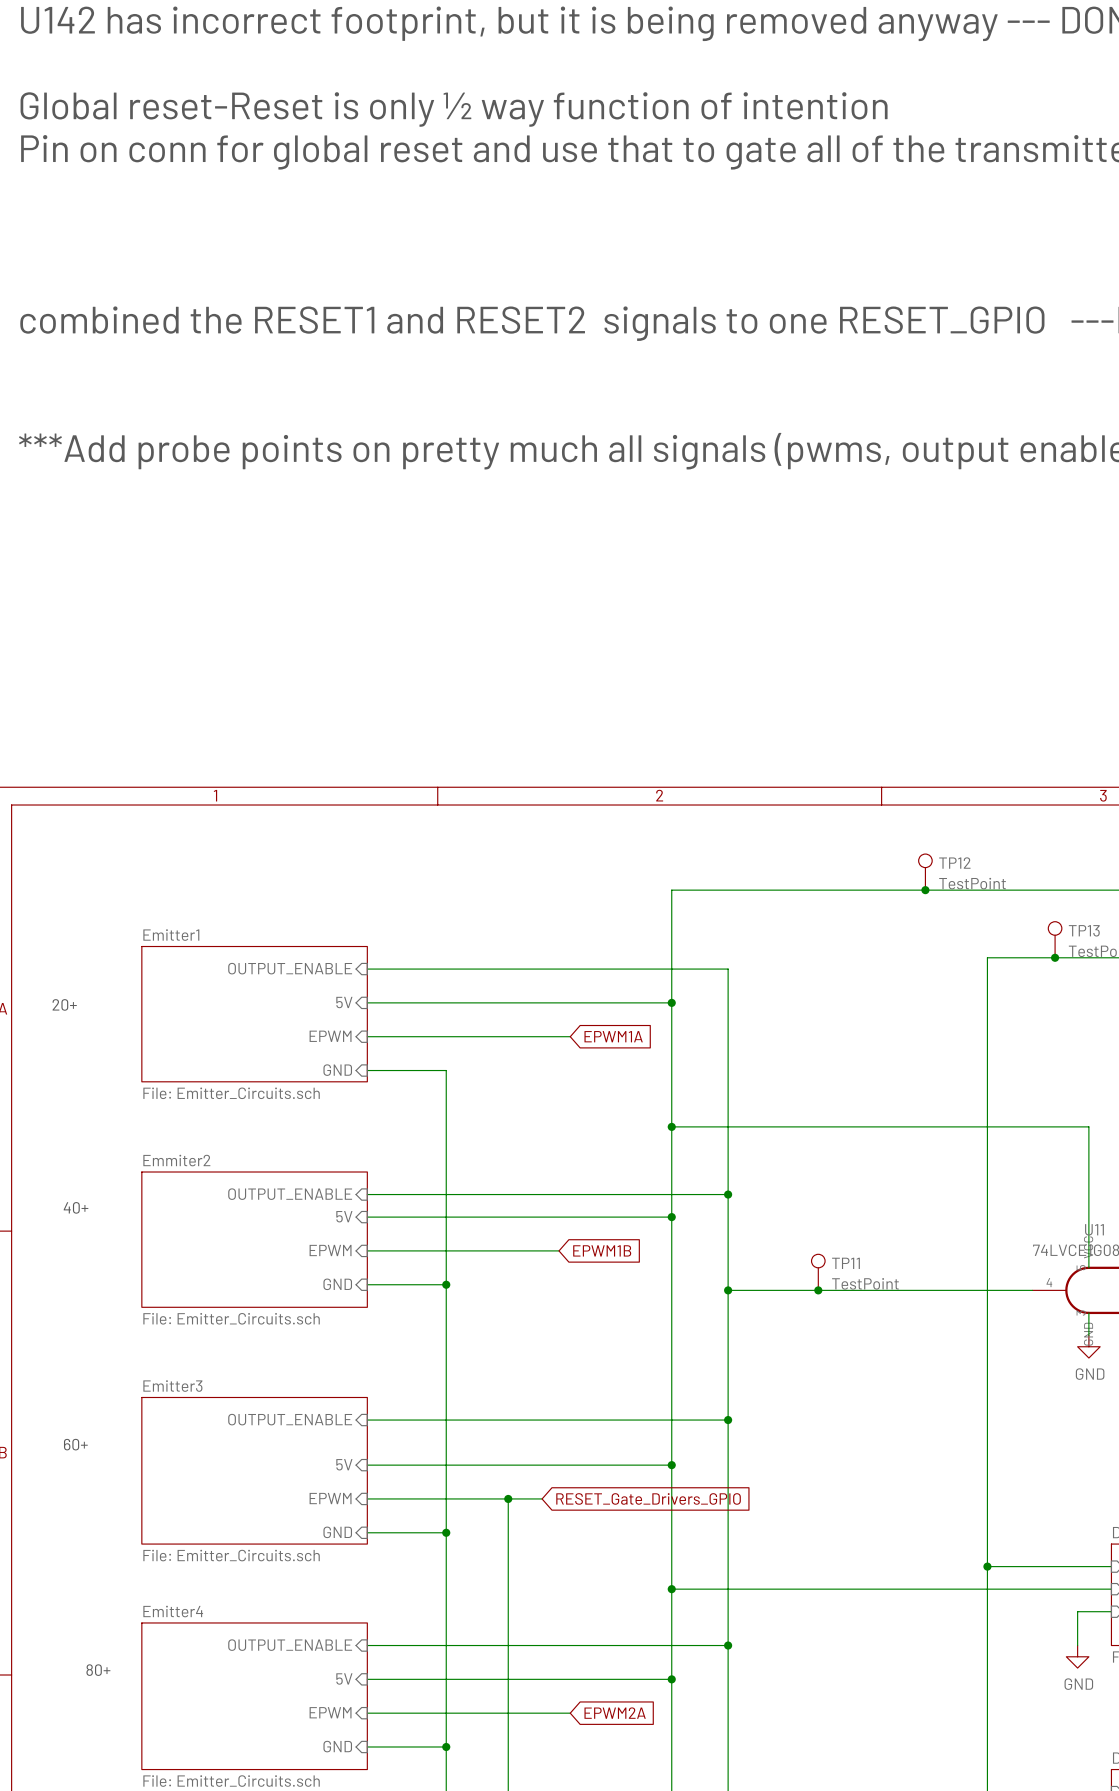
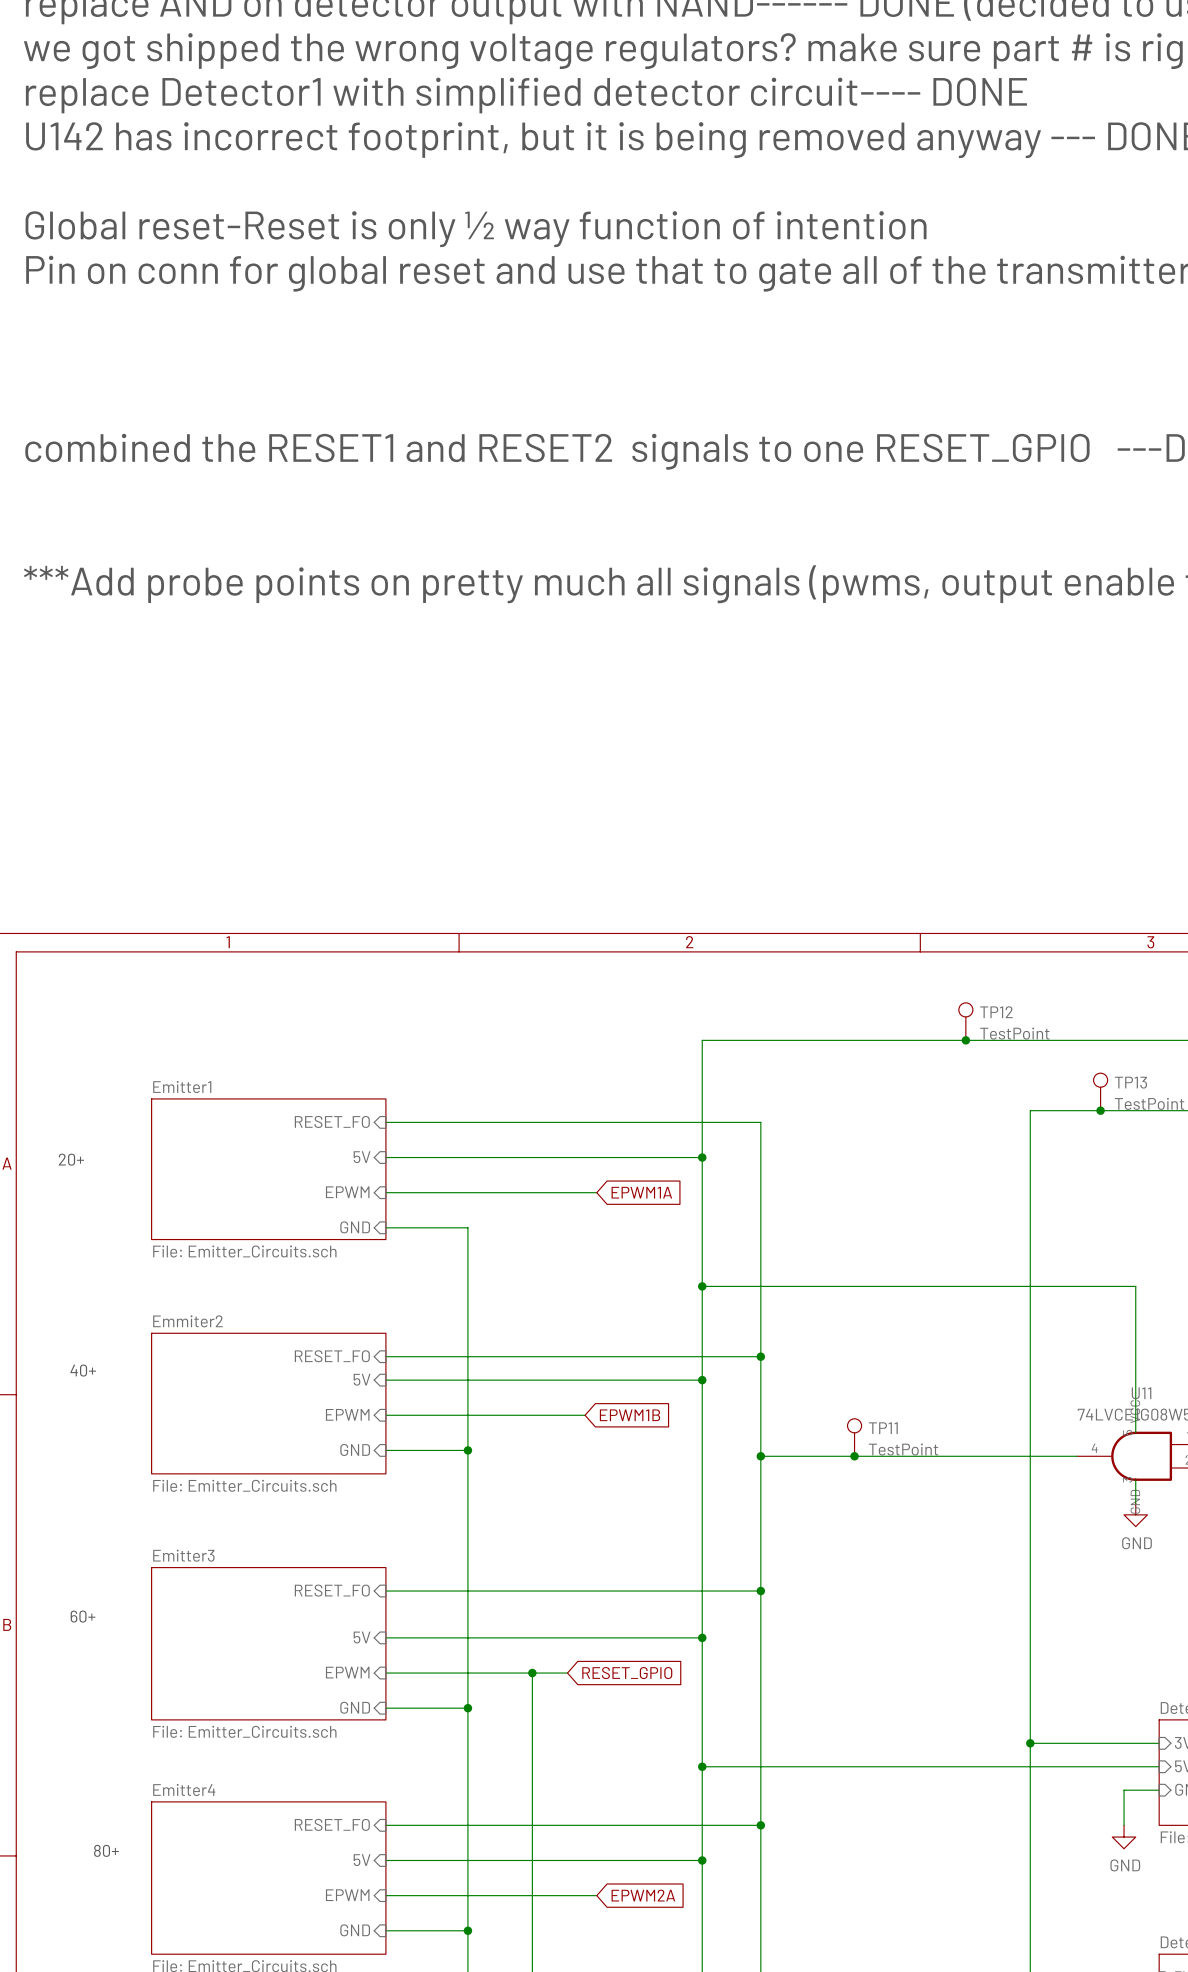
sheet pin: OUTPUT_ENABLE (290, 968) -> RESET_FO (332, 1121)
sheet pin: OUTPUT_ENABLE (290, 1194) -> RESET_FO (332, 1356)
sheet pin: OUTPUT_ENABLE (290, 1419) -> RESET_FO (332, 1590)
global label: RESET_Gate_Drivers_GPIO (648, 1498) -> RESET_GPIO (627, 1673)
sheet pin: OUTPUT_ENABLE (290, 1645) -> RESET_FO (332, 1824)

